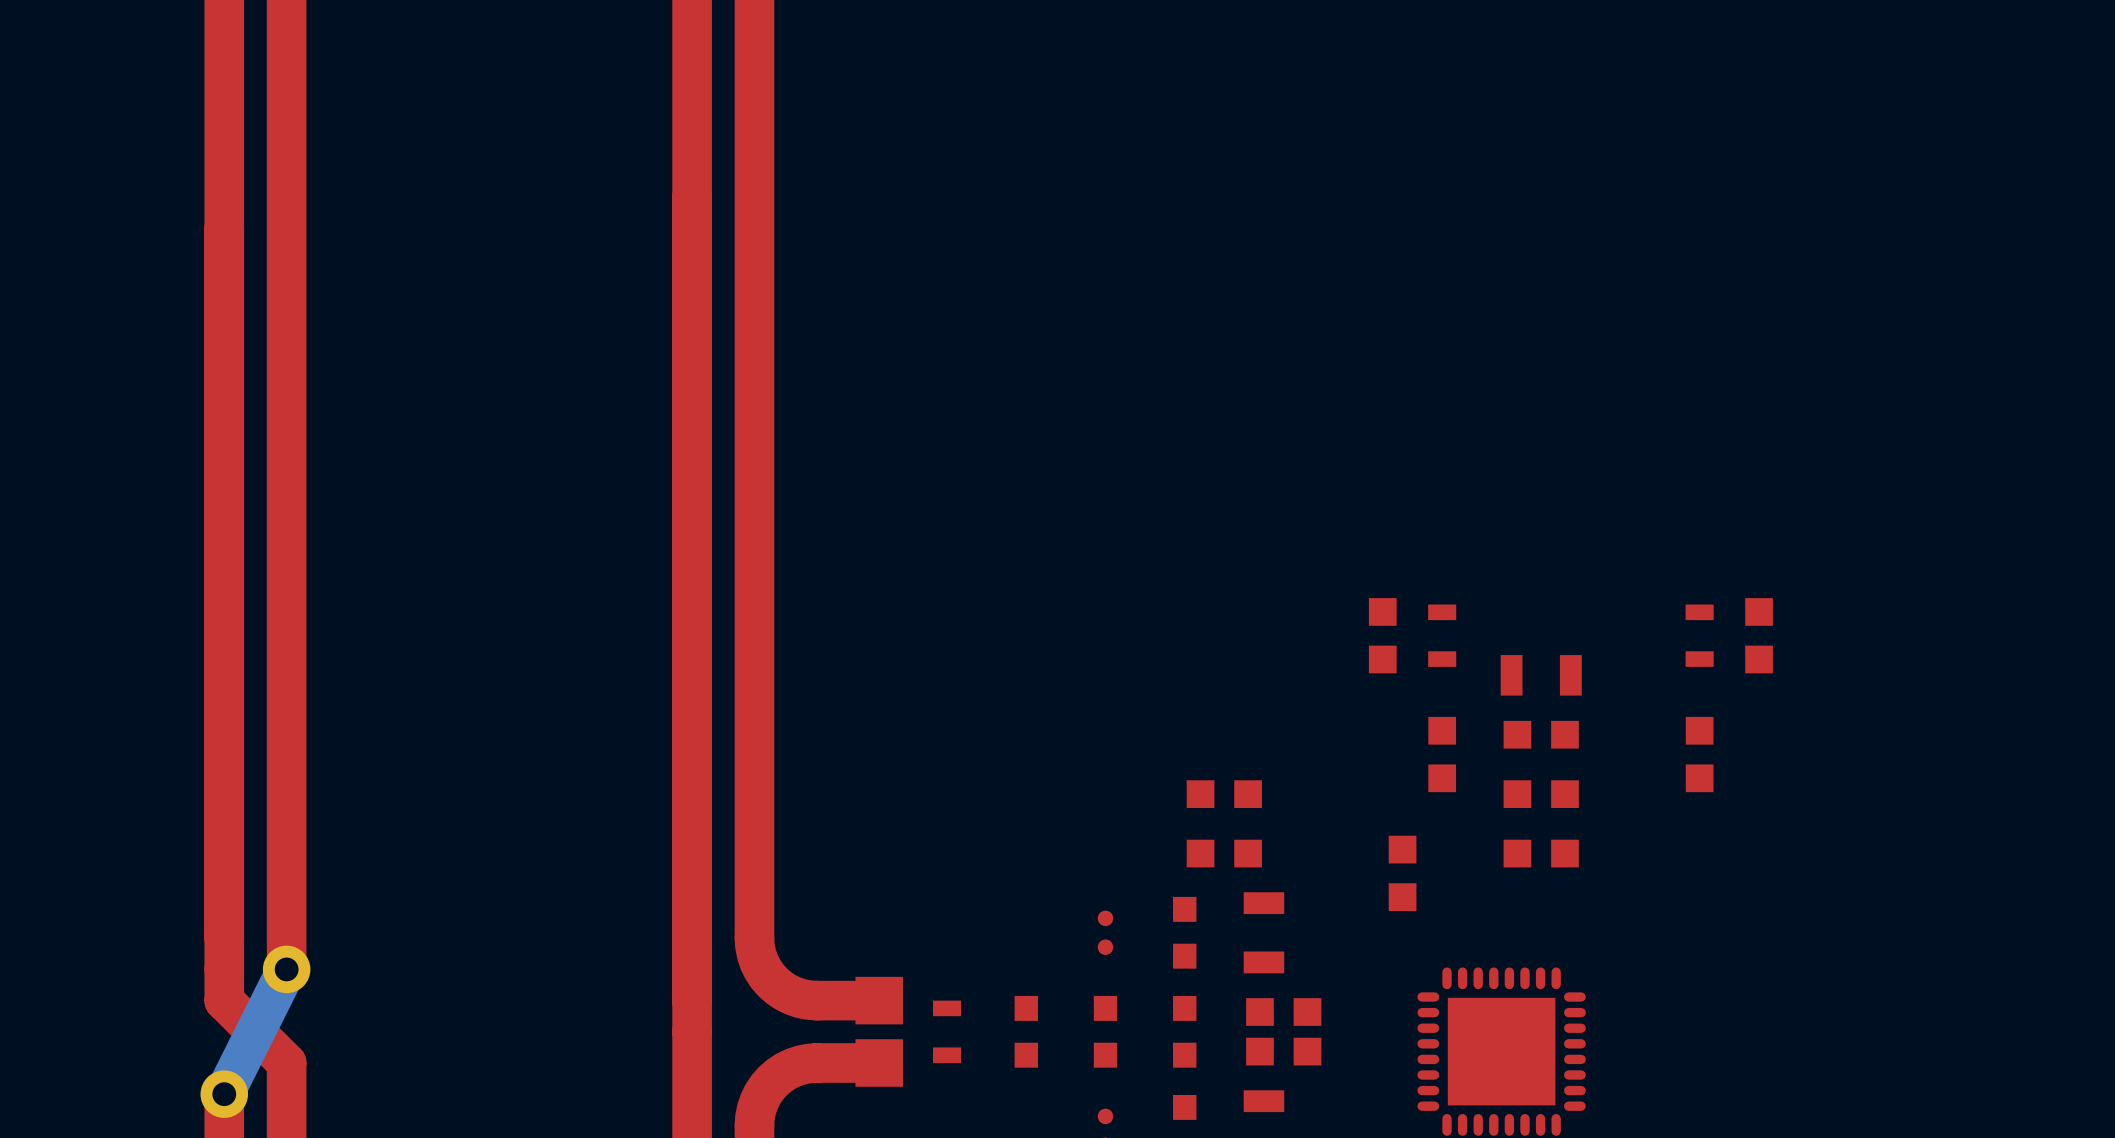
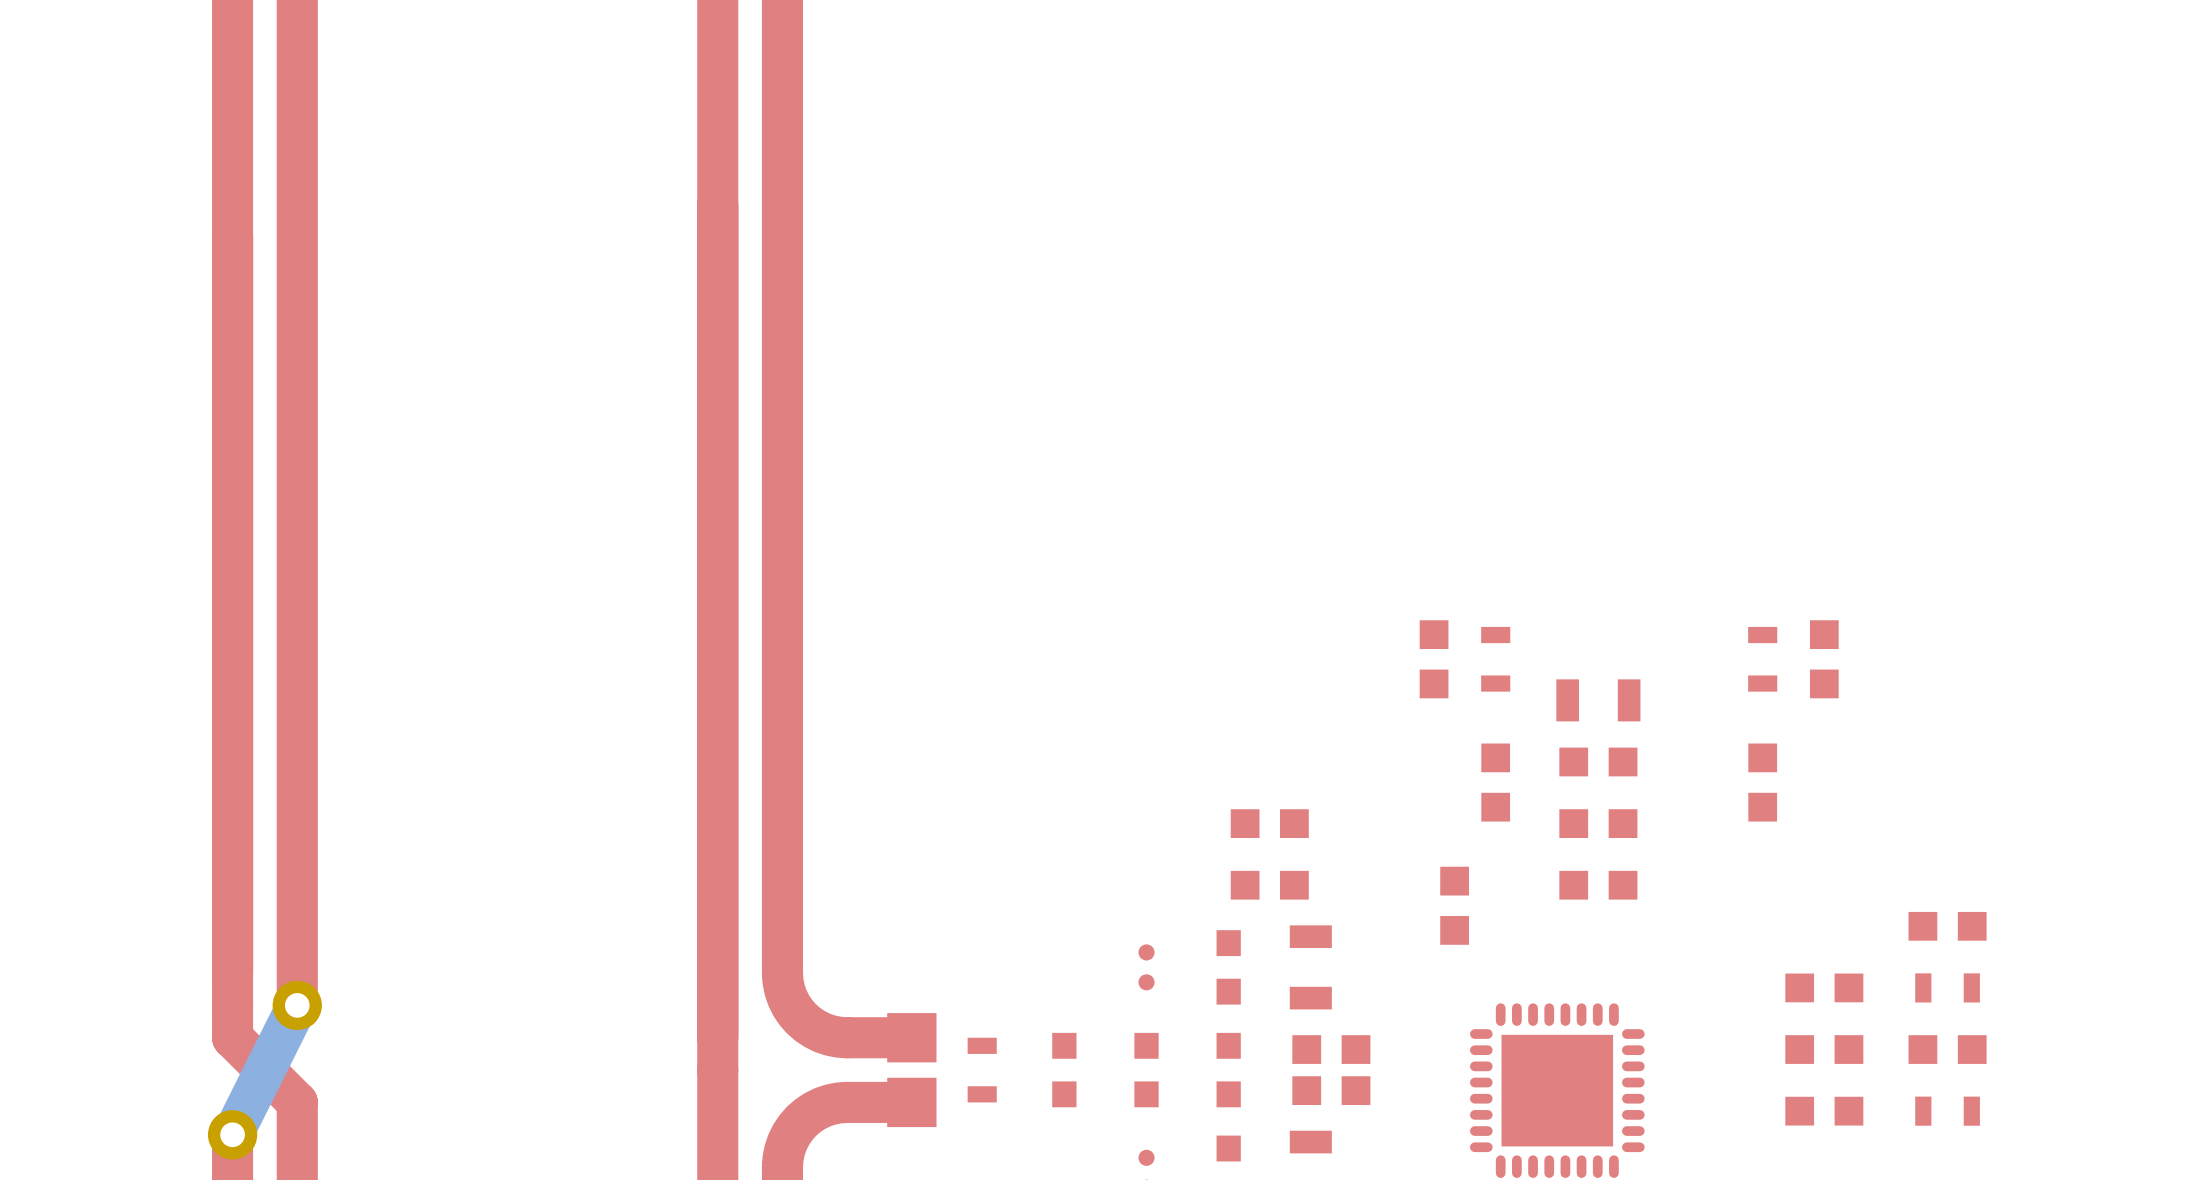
part: none -> (1947, 926)
part: none -> (1824, 987)
part: none -> (1947, 987)
part: none -> (1824, 1049)
part: none -> (1947, 1049)
part: none -> (1824, 1111)
part: none -> (1947, 1111)

